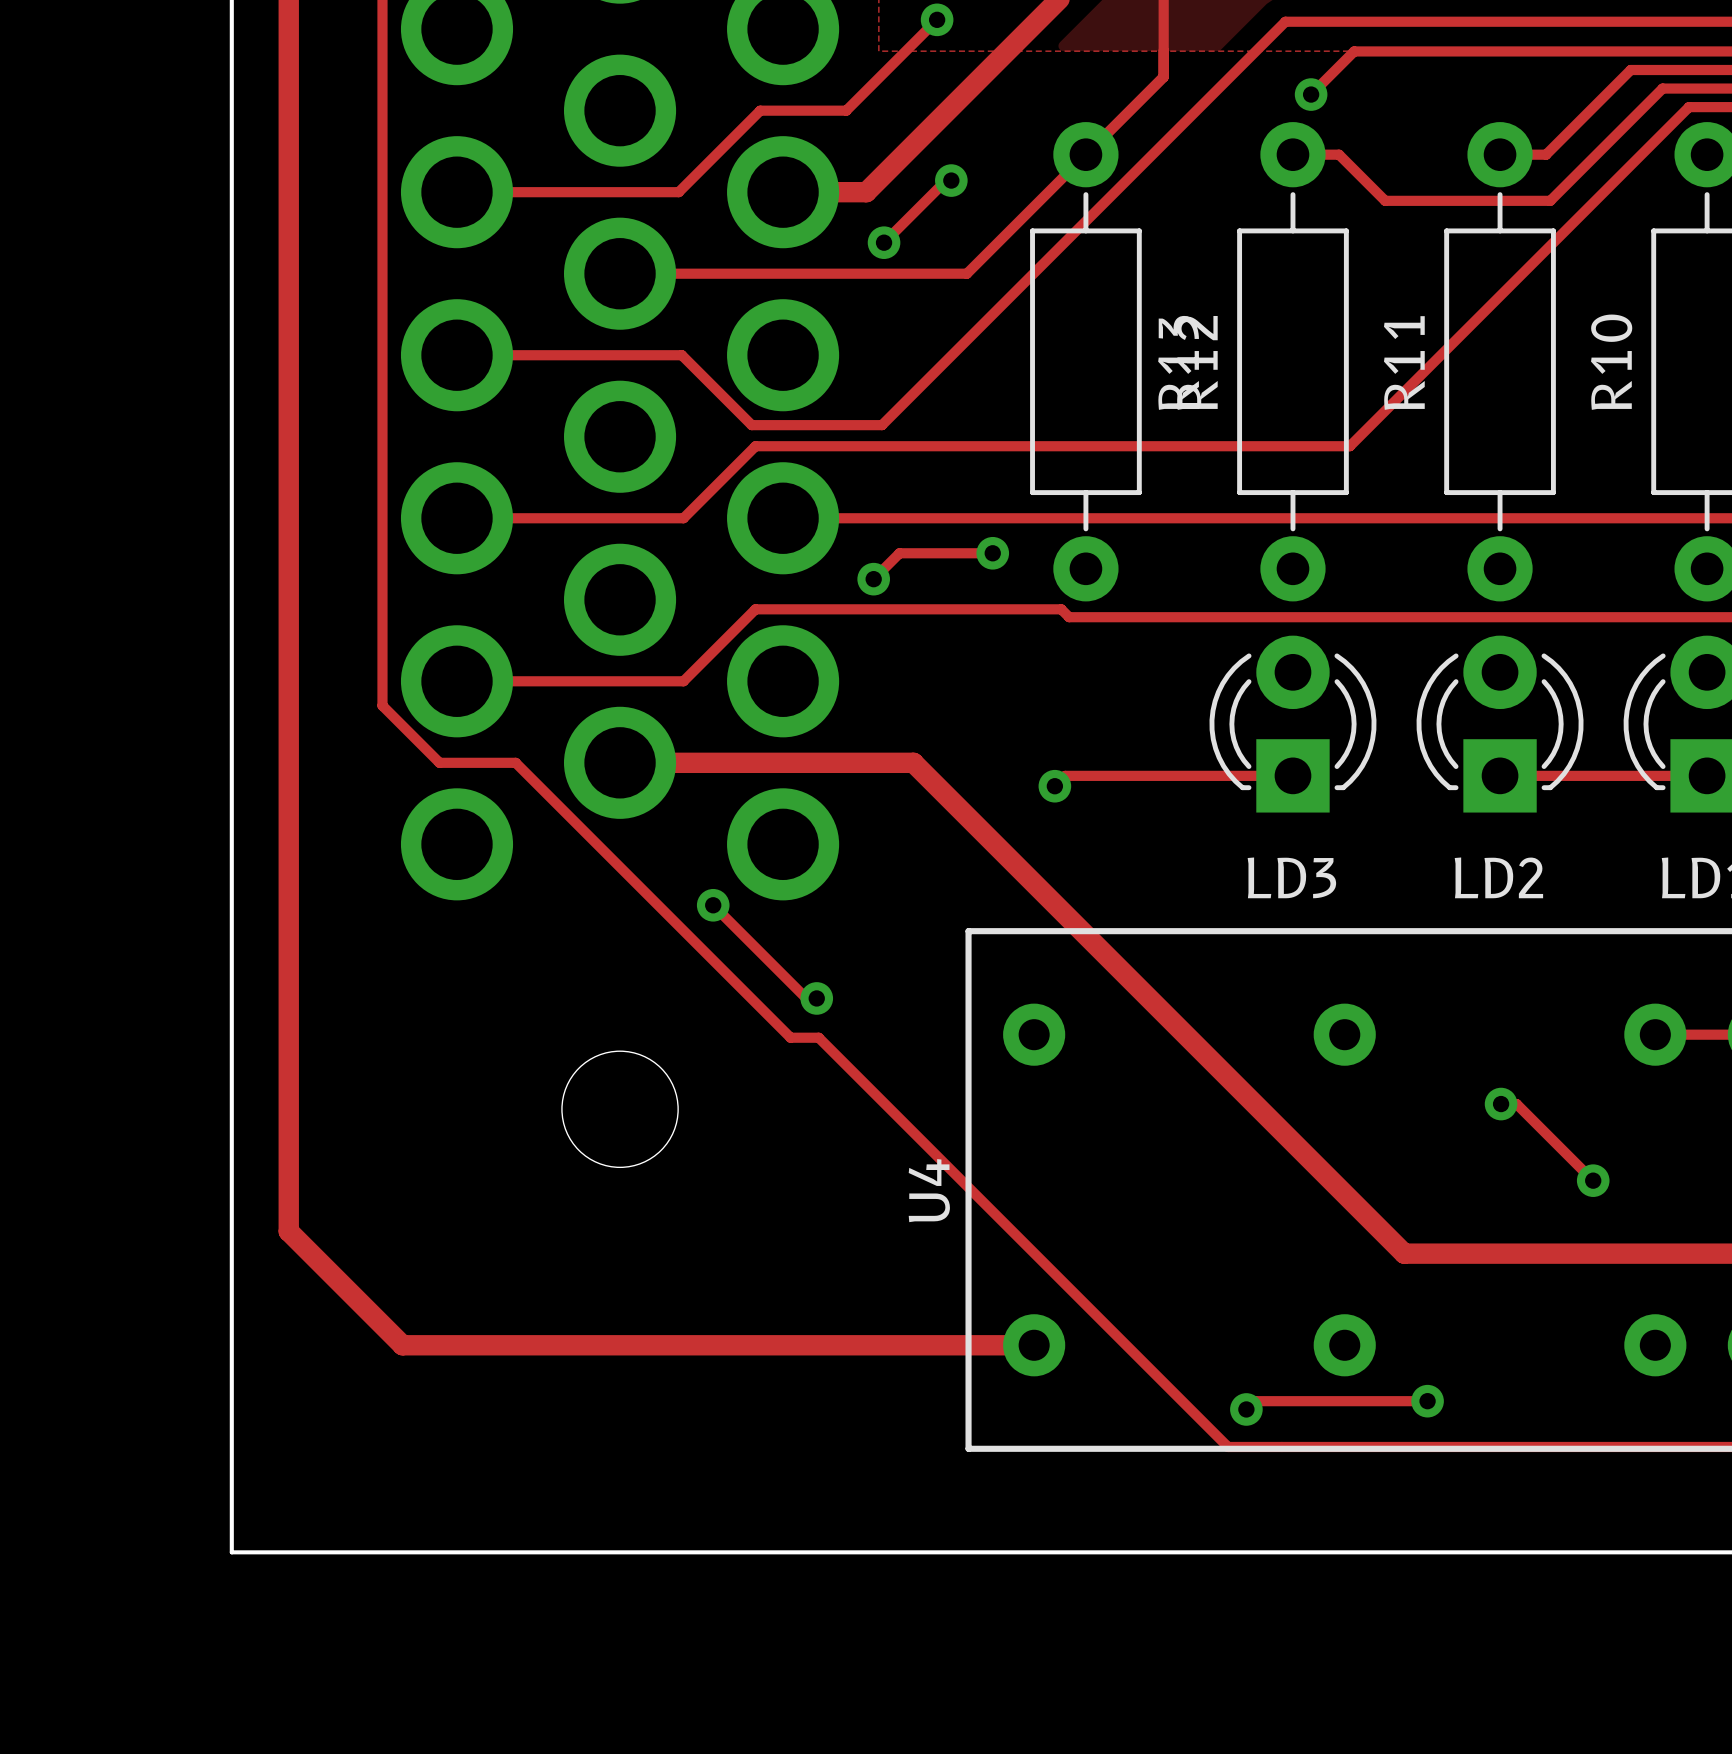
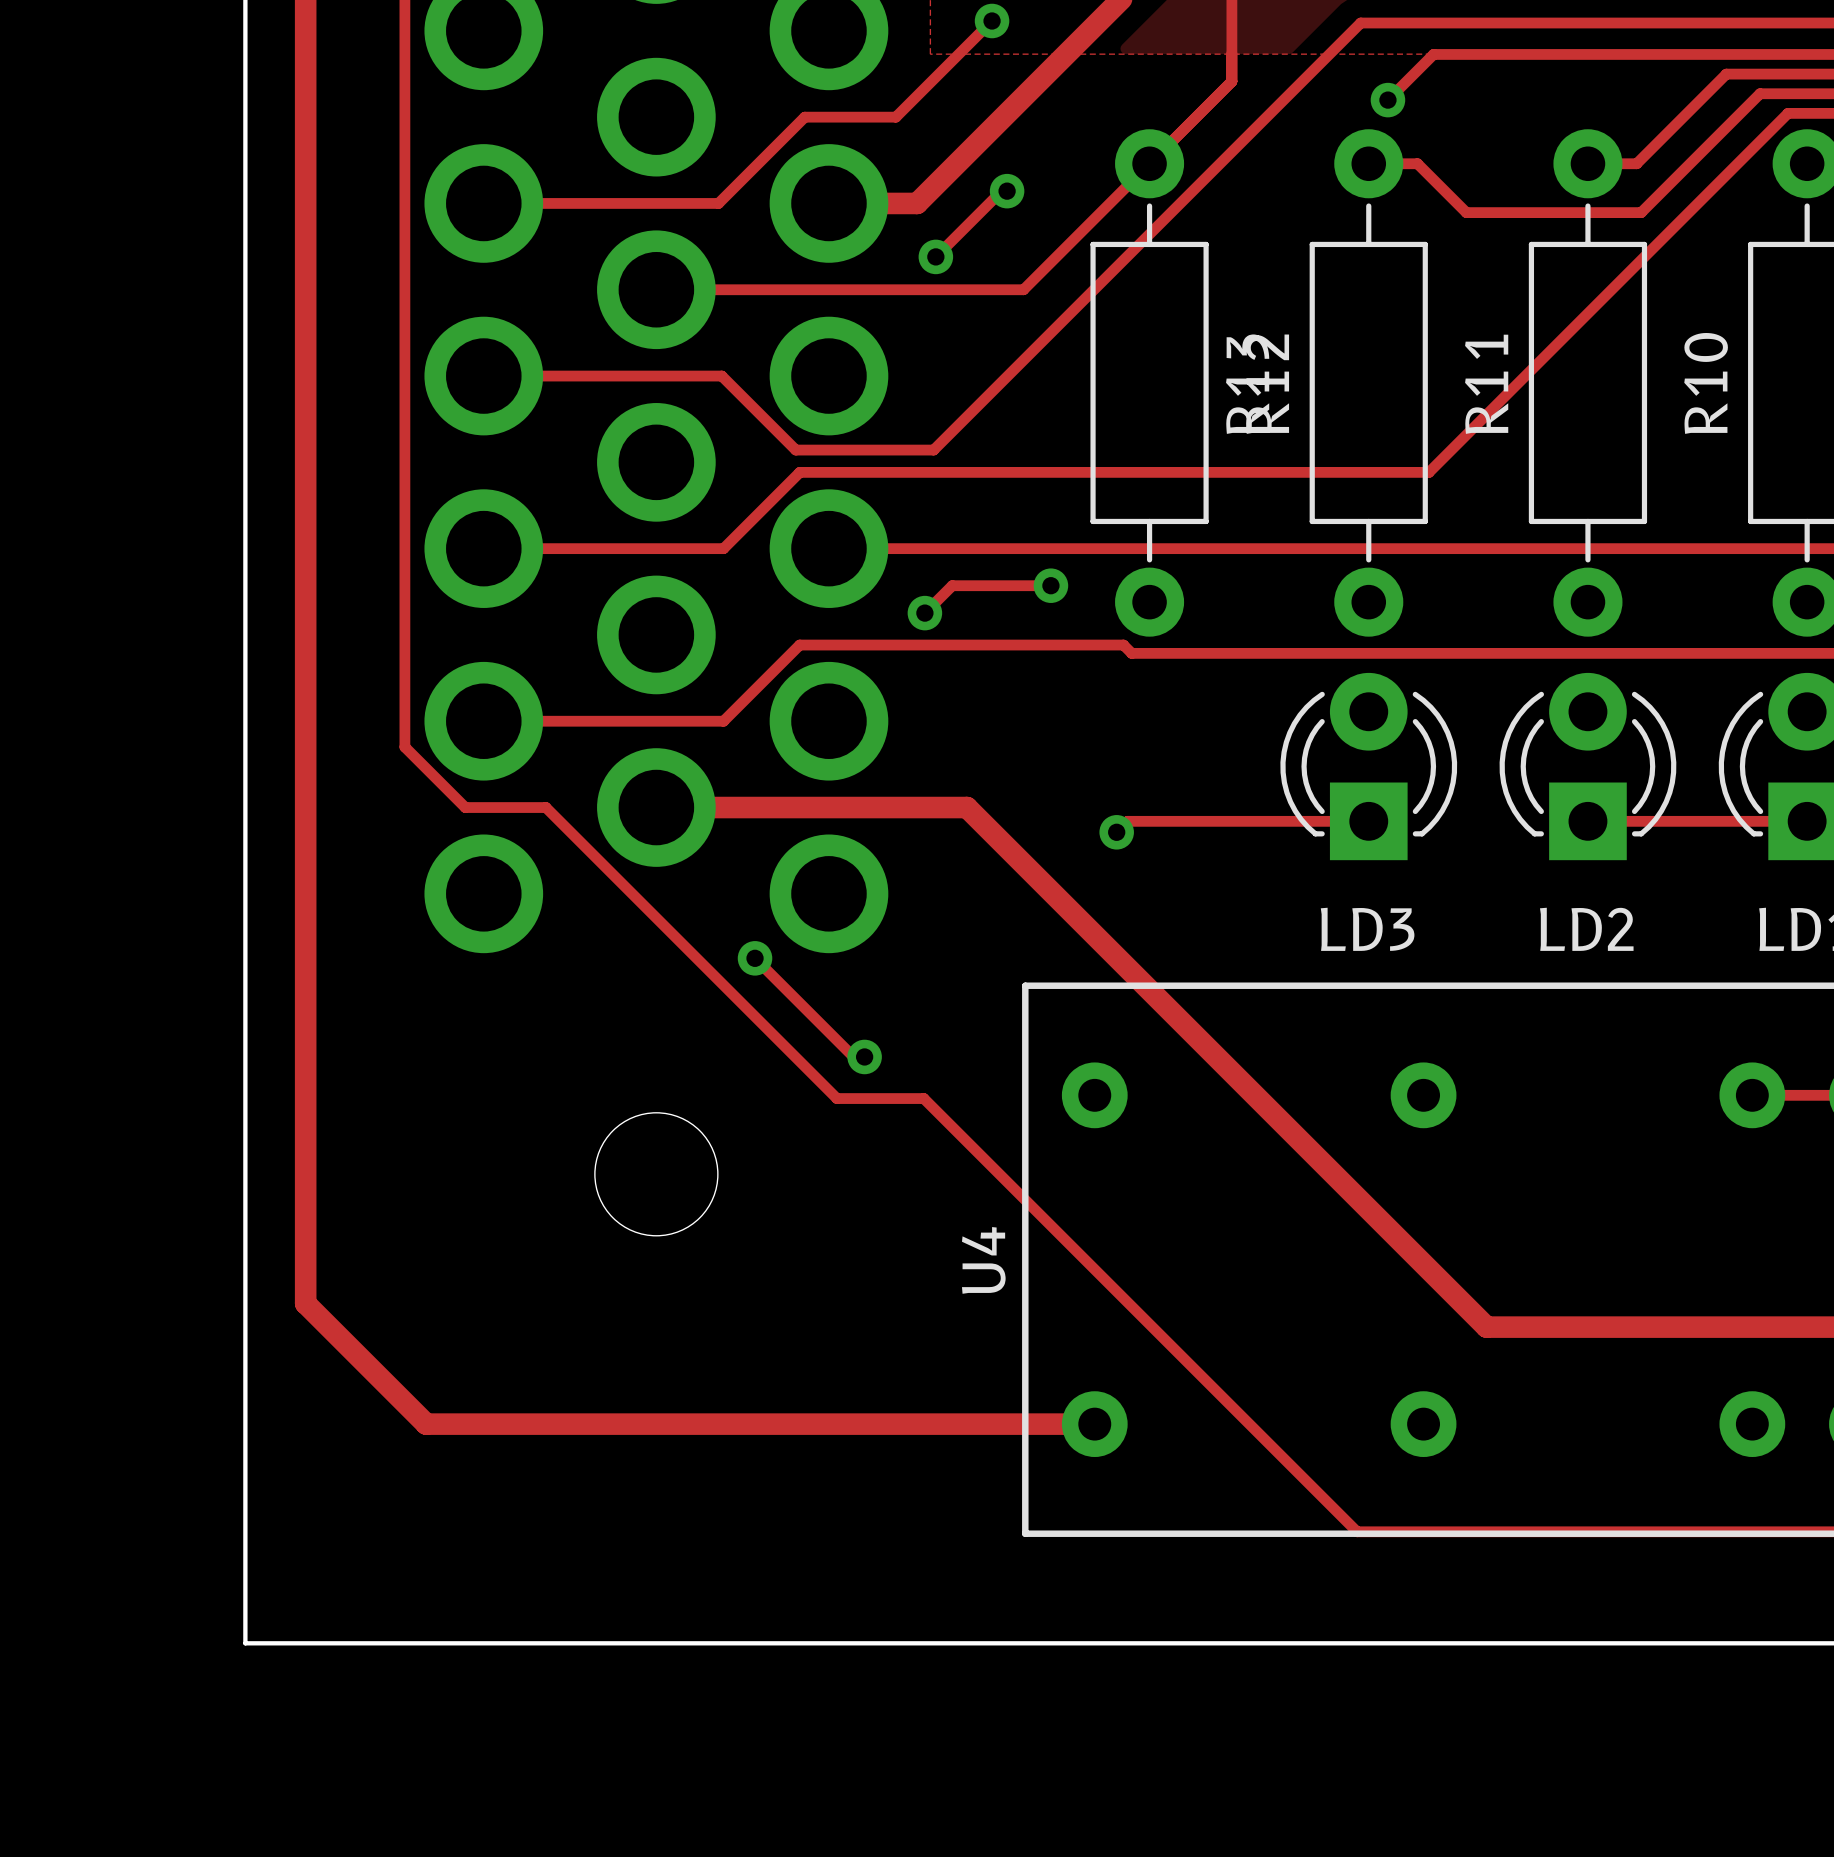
track: (818, 1037) (1228, 1446) (1281, 1446) -> (866, 1098) (923, 1098) (1357, 1531)
track: (1501, 1104) (1516, 1104) (1593, 1180) -> none
via: (1501, 1104) -> none
via: (1593, 1180) -> none
track: (1427, 1401) (1254, 1401) (1246, 1409) -> none
via: (1427, 1401) -> none
via: (1246, 1409) -> none

